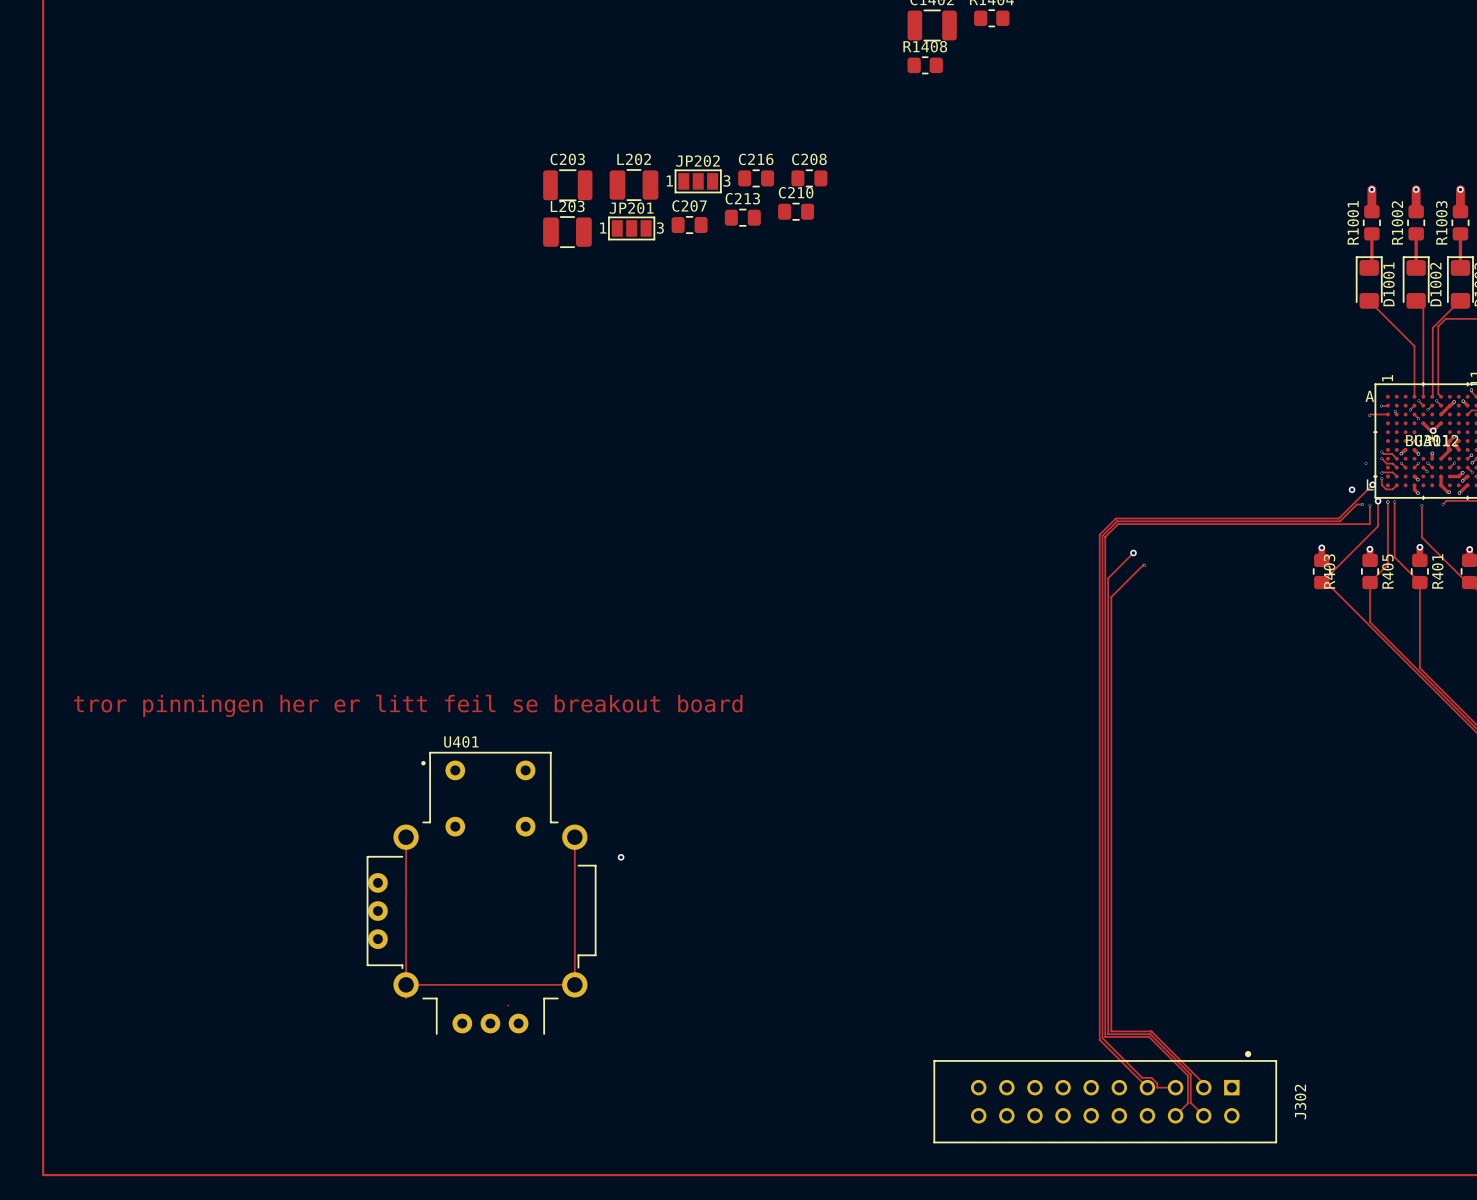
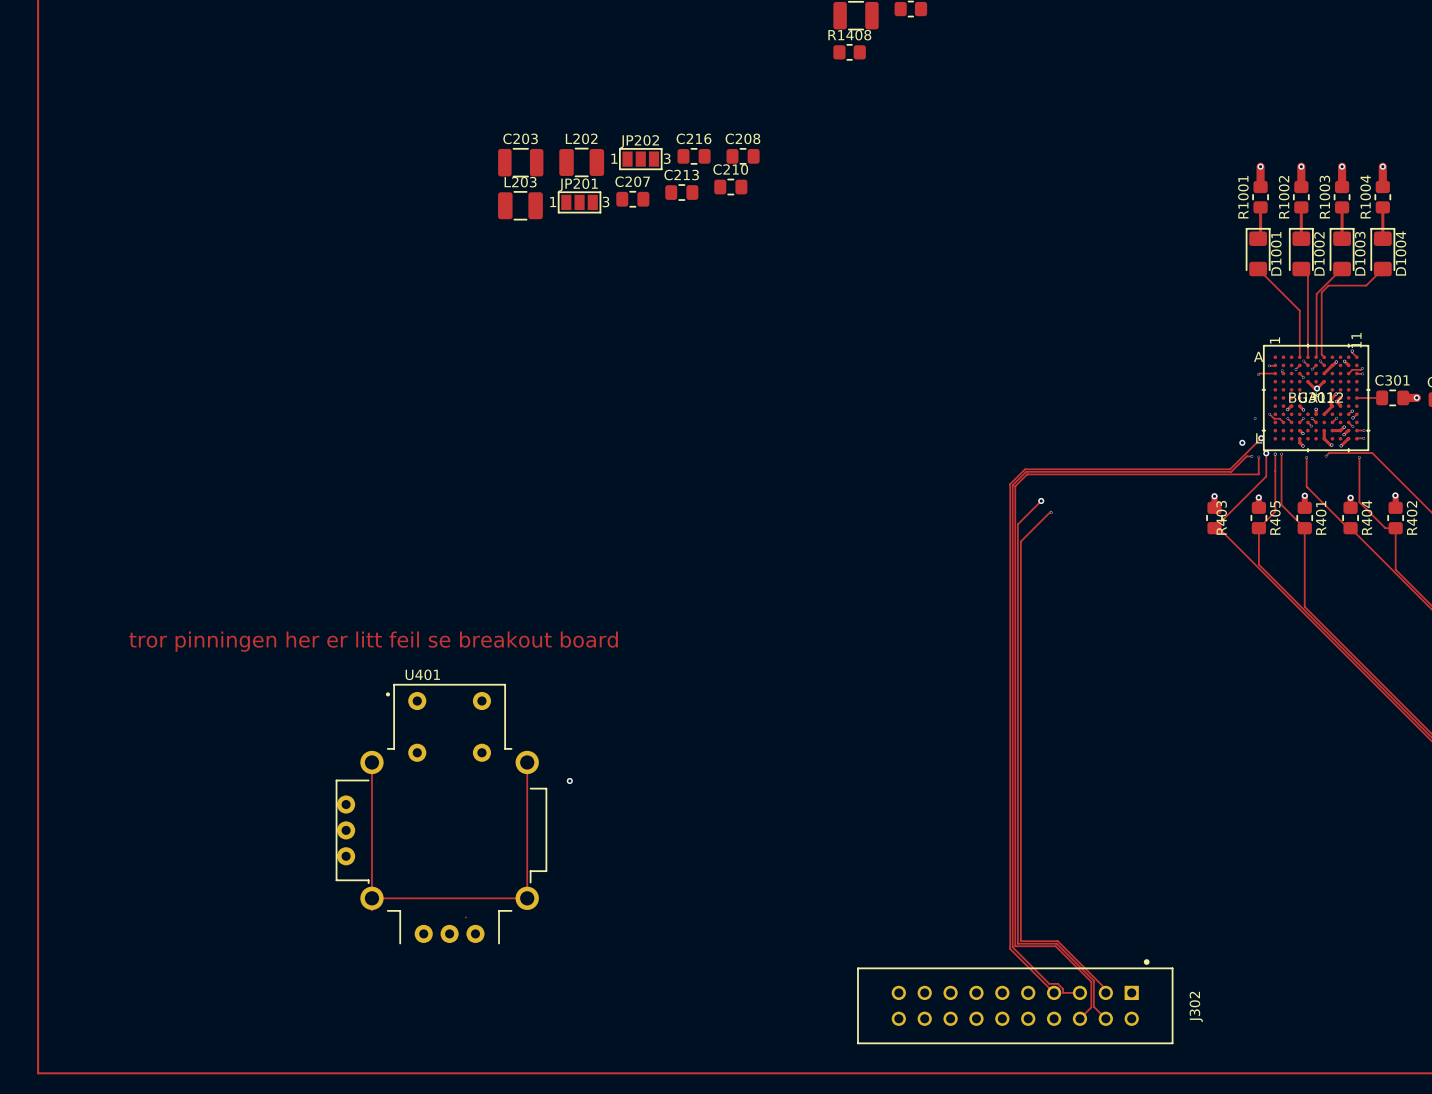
track: (1381, 452) (1383, 453) (1391, 453) (1396, 458) -> none
via: (1381, 452) -> none
track: (1381, 473) (1392, 472) (1396, 476) -> none
via: (1381, 473) -> none
track: (1381, 478) (1381, 484) (1386, 489) (1392, 489) (1396, 485) -> none
via: (1381, 478) -> none

